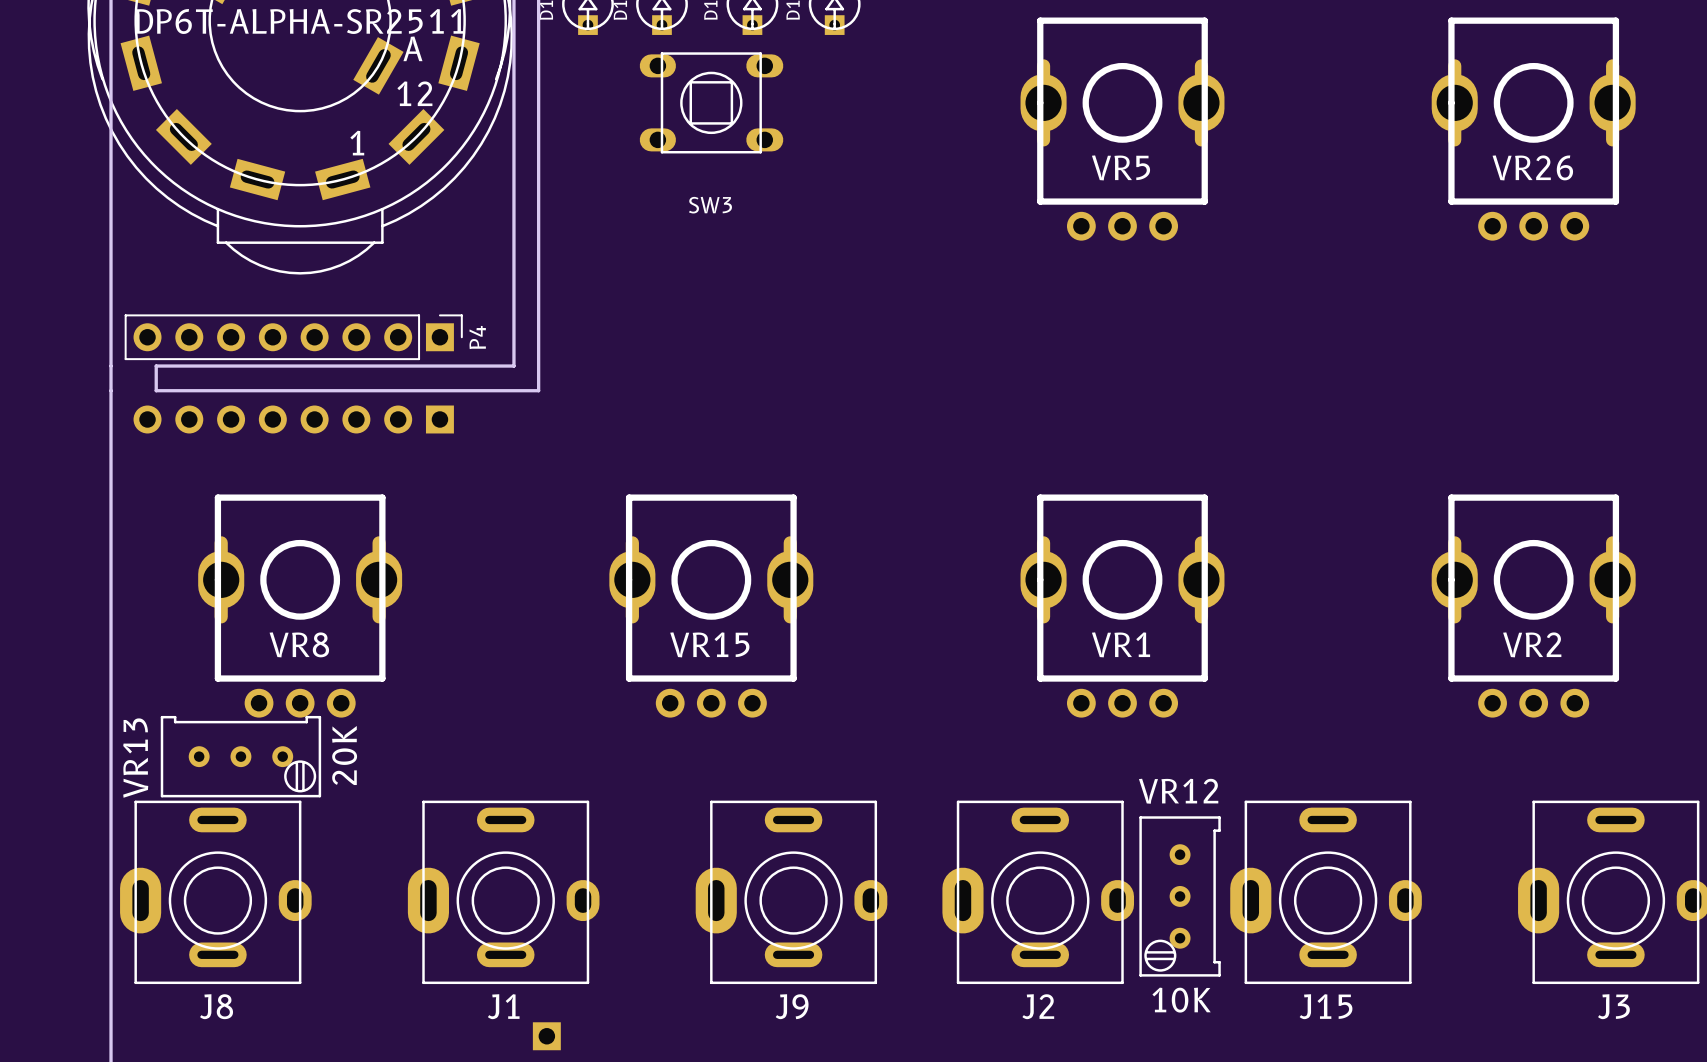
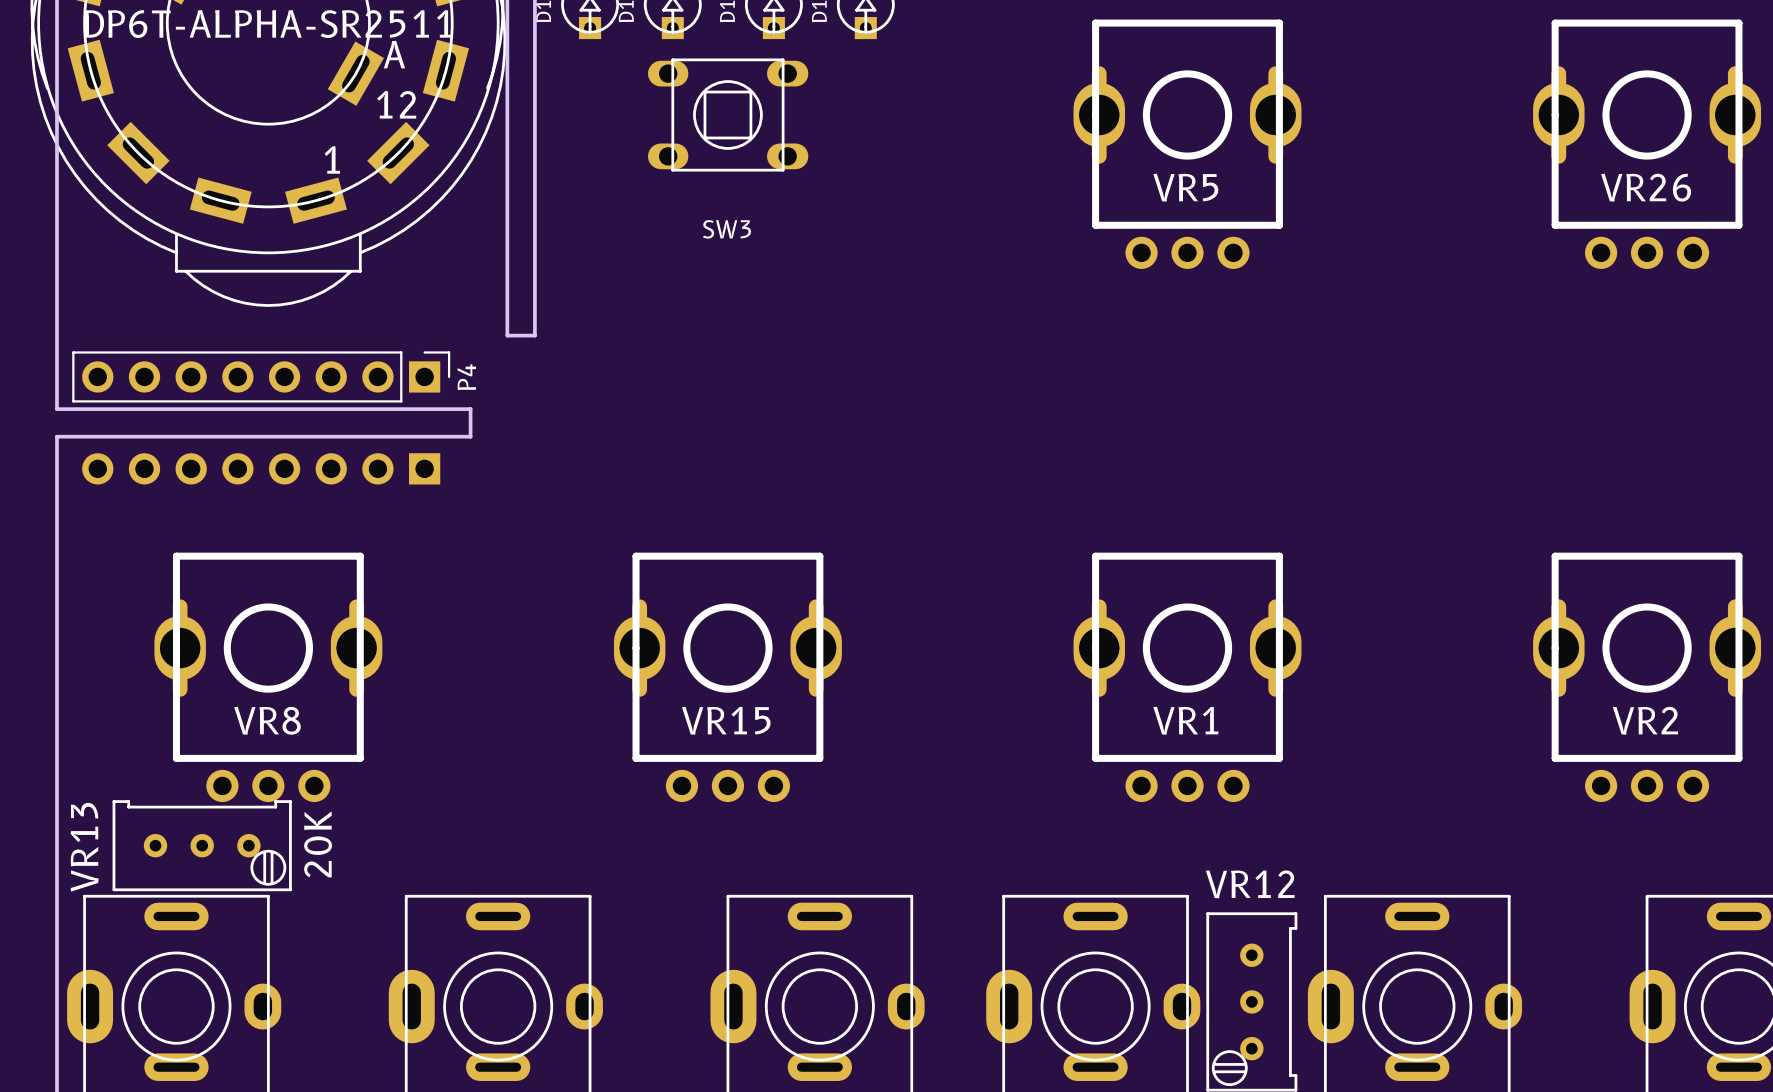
board edge: (513, 300) (513, 366) (481, 366) -> (507, 335) (534, 335)
board edge: (538, 300) (538, 390) (481, 390) -> (470, 409) (470, 436)
board edge: (111, 366) (111, 390) -> (56, 409) (107, 409)
board edge: (156, 366) (156, 390) -> (56, 436) (107, 436)

